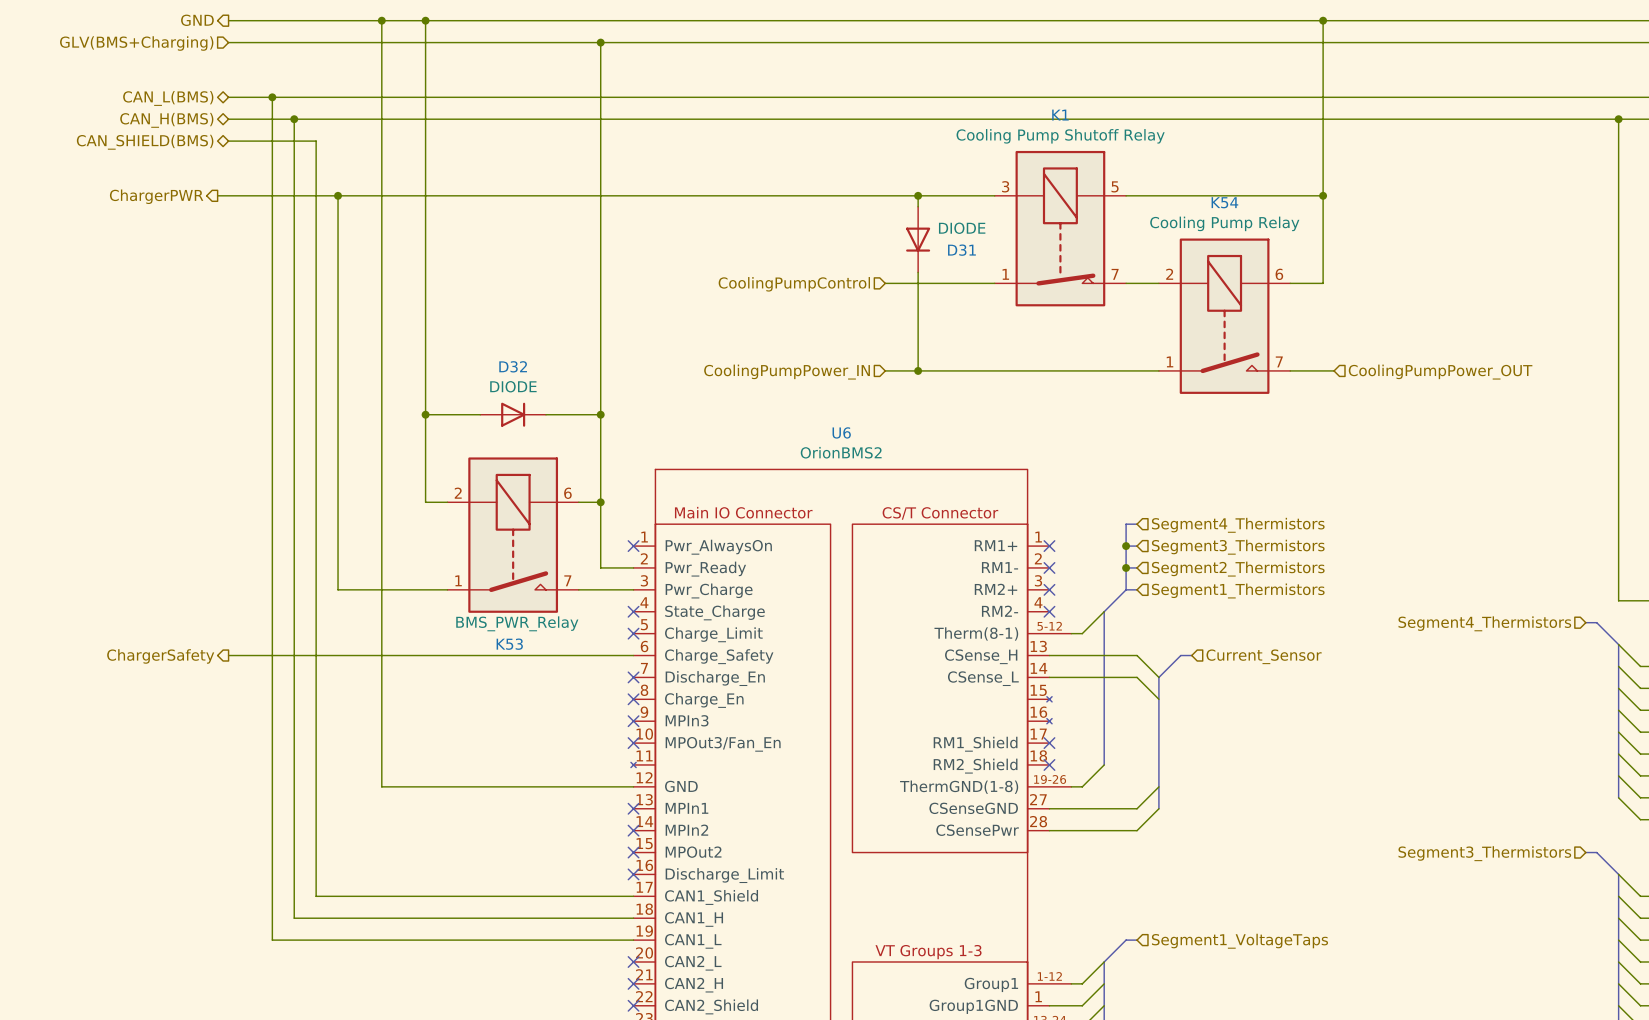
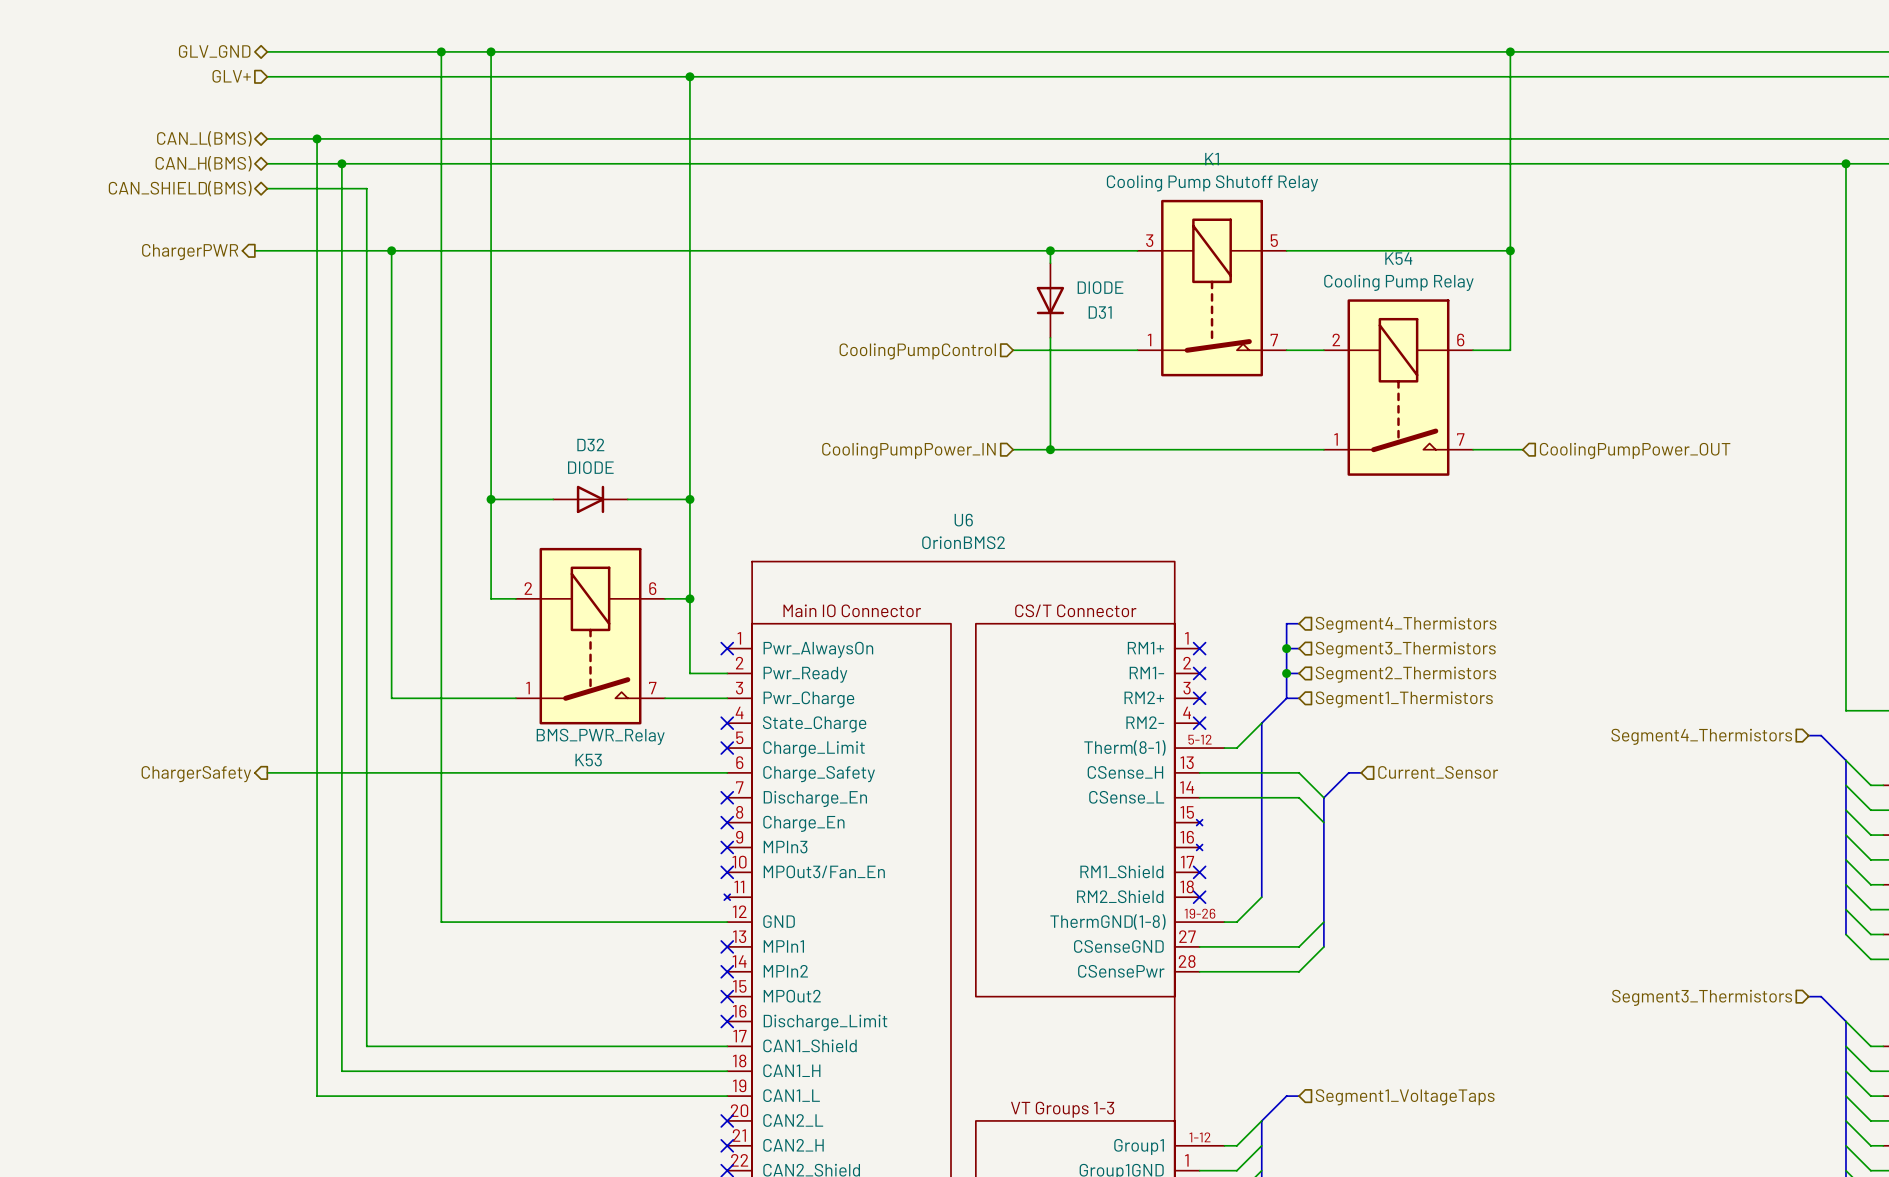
hierarchical label shape: output (197, 20) -> bidirectional (214, 51)
hierarchical label: GND (197, 20) -> GLV_GND (214, 51)
hierarchical label: GLV(BMS+Charging) (136, 43) -> GLV+ (231, 76)

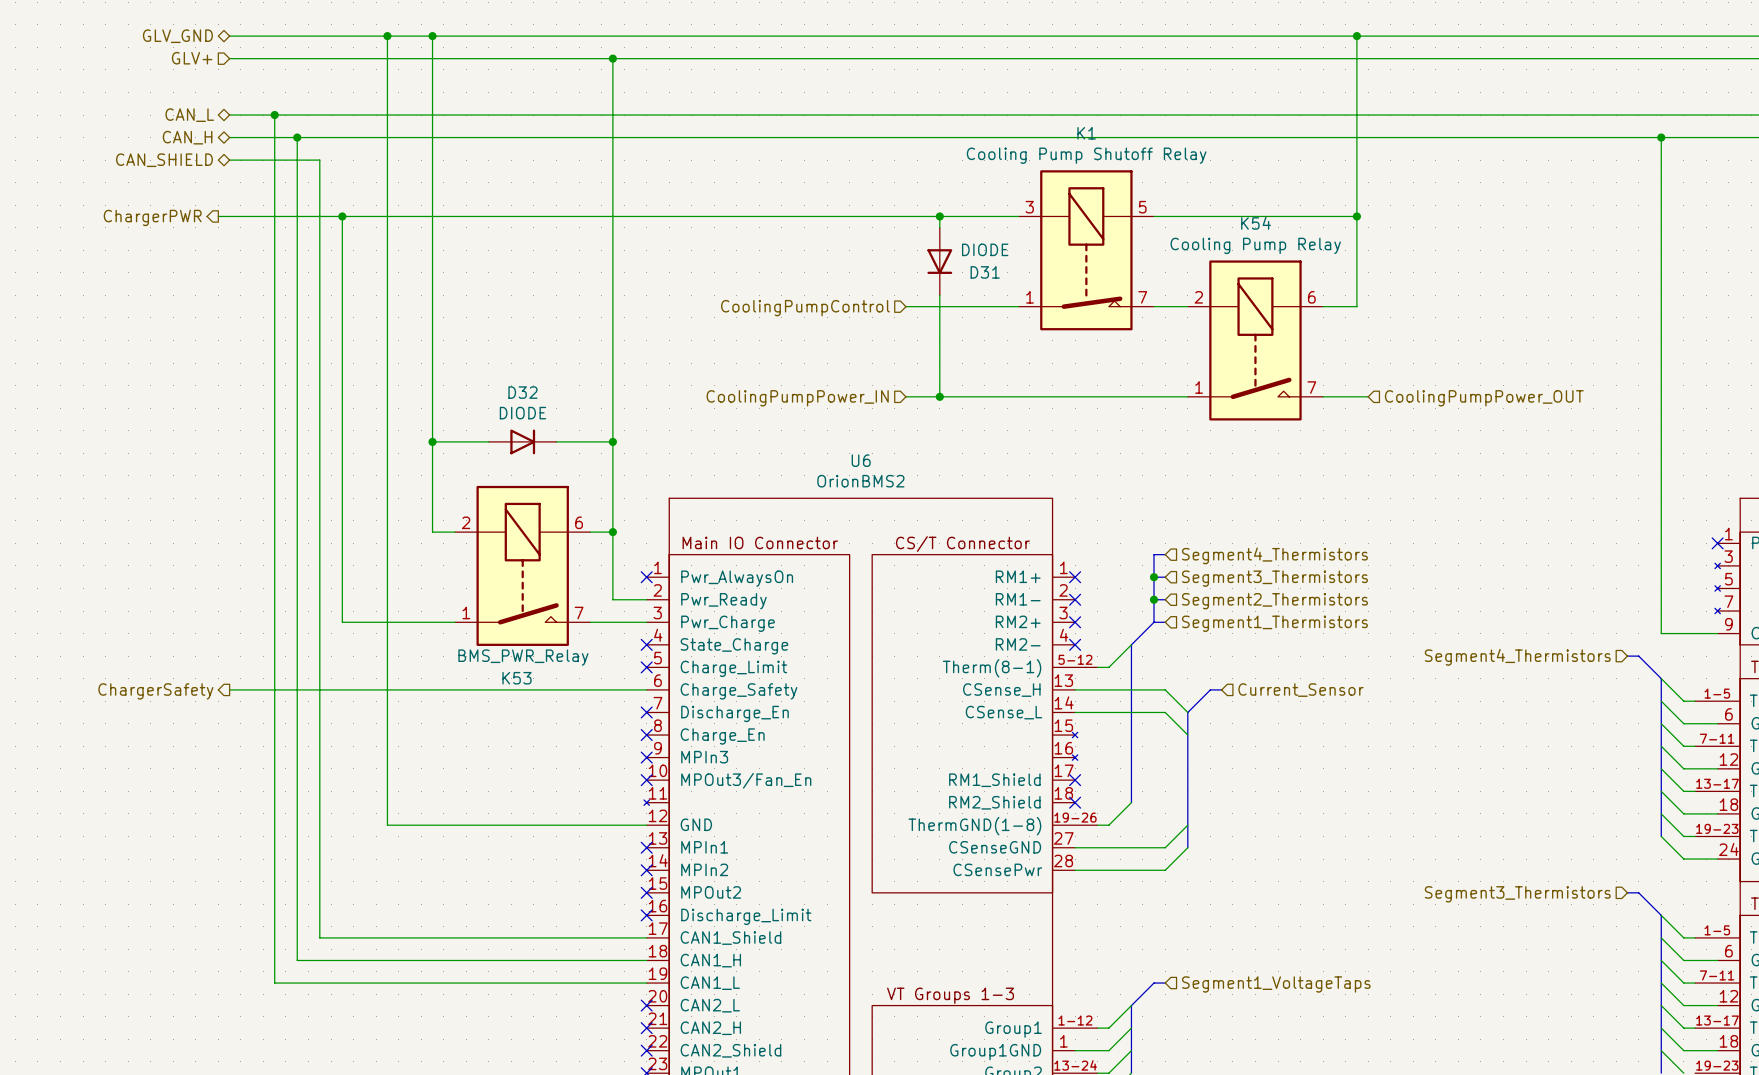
hierarchical label: CAN_L(BMS) (204, 138) -> CAN_L (189, 115)
hierarchical label: CAN_H(BMS) (203, 163) -> CAN_H (187, 137)
hierarchical label: CAN_SHIELD(BMS) (180, 188) -> CAN_SHIELD (164, 160)

